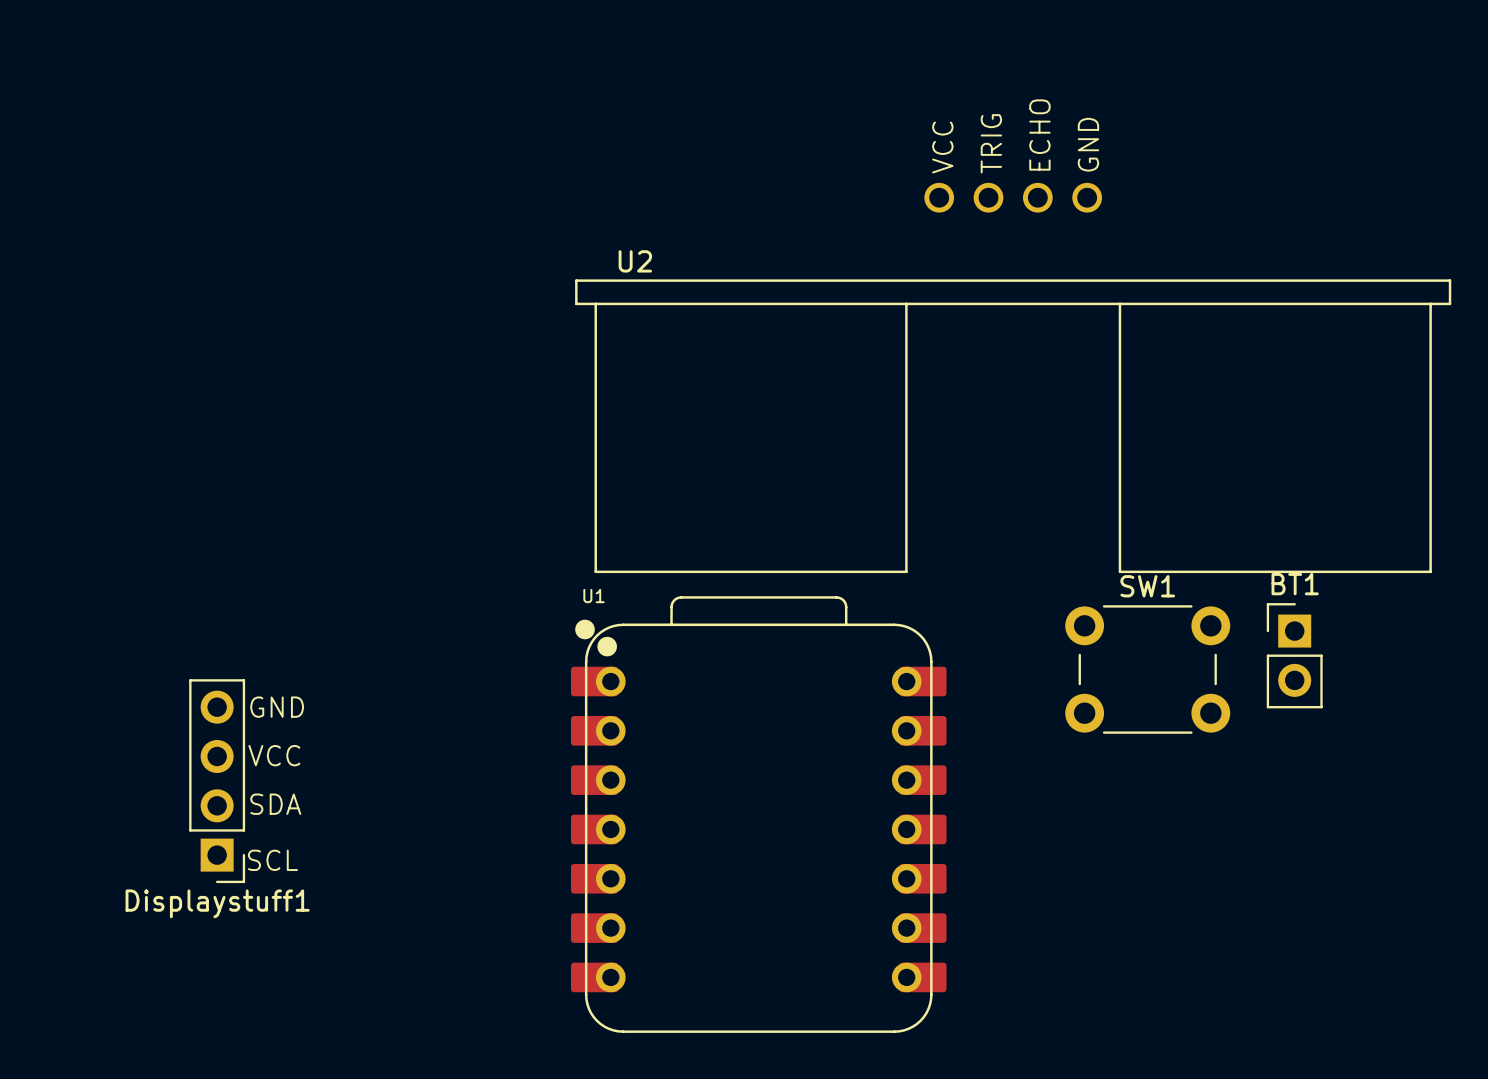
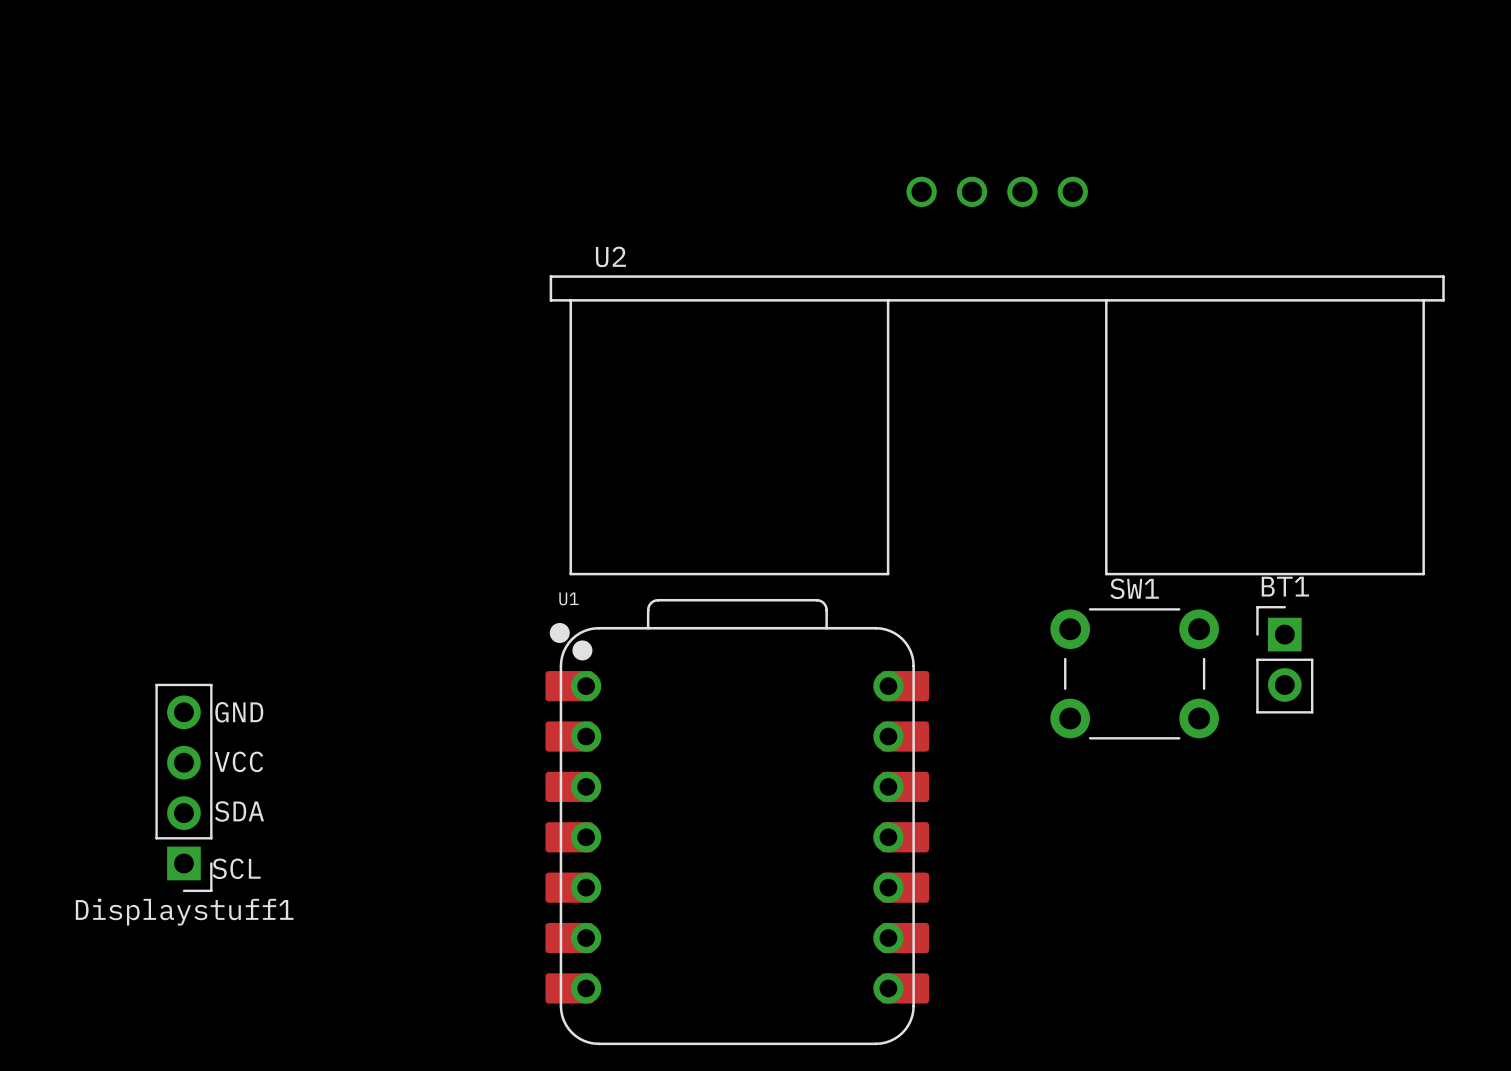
text: ECHO (1039, 135) -> none
text: TRIG (991, 143) -> none
text: GND (1088, 144) -> none
text: VCC (942, 147) -> none

